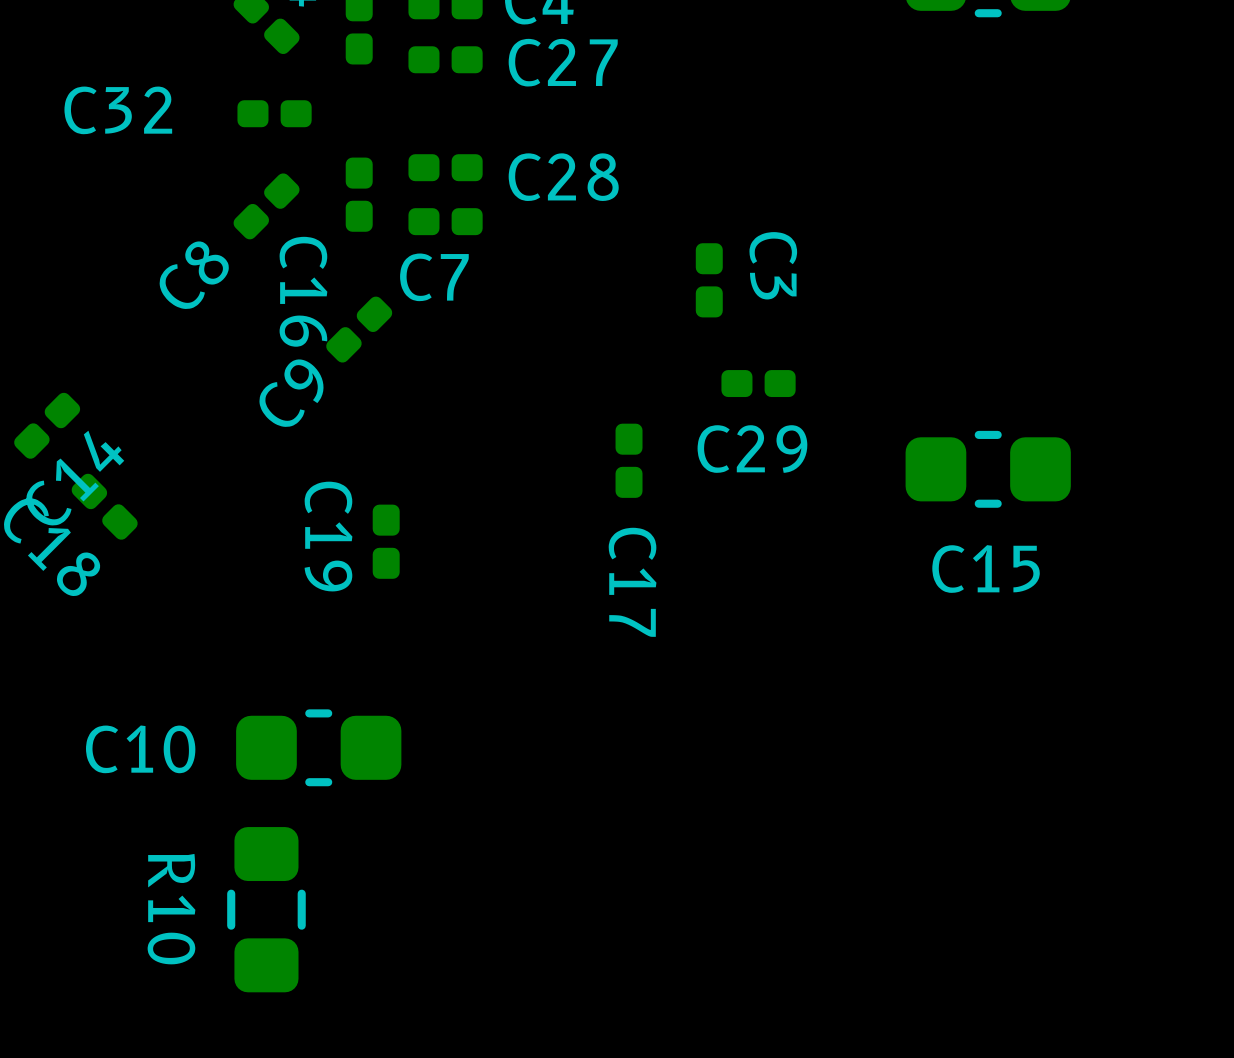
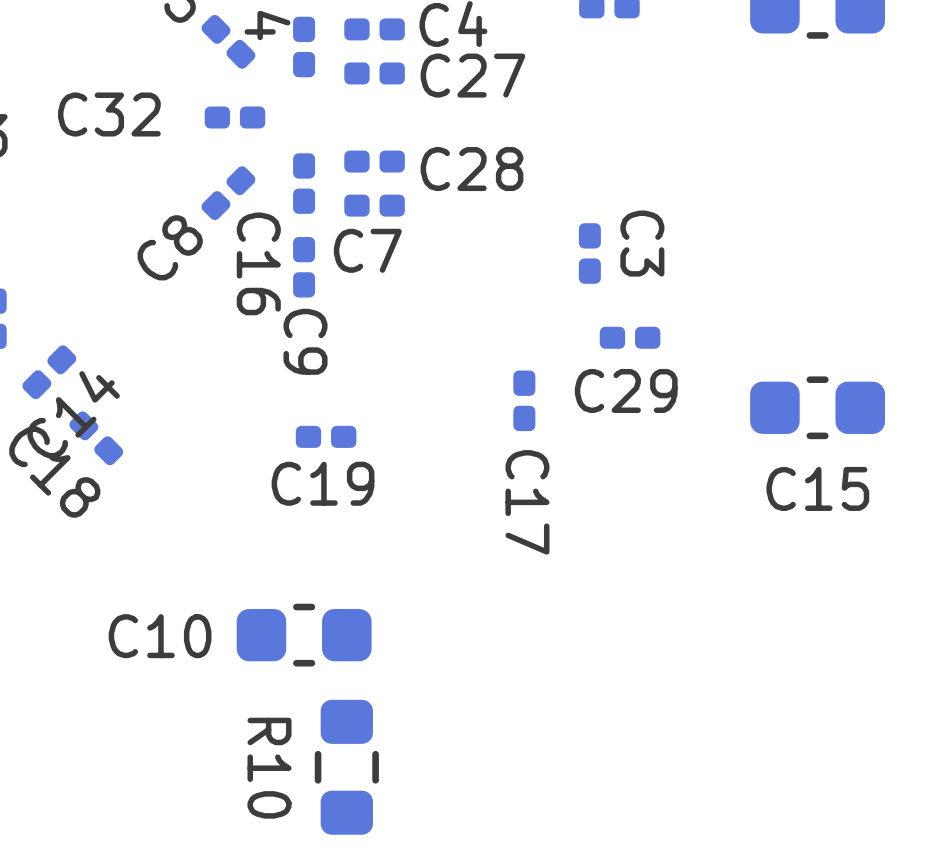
C9 rotation: 0° (359, 329) -> 45° counterclockwise (304, 267)
C19 rotation: 0° (386, 541) -> 90° clockwise (326, 436)
C10 position: (318, 747) -> (304, 635)
R10 position: (266, 909) -> (346, 767)

